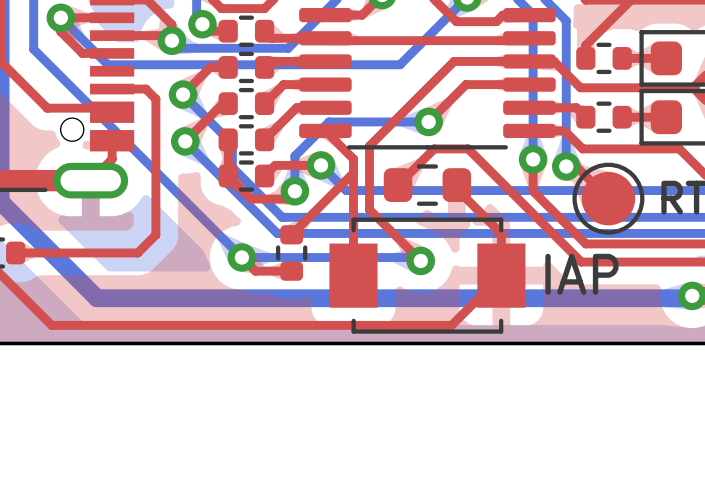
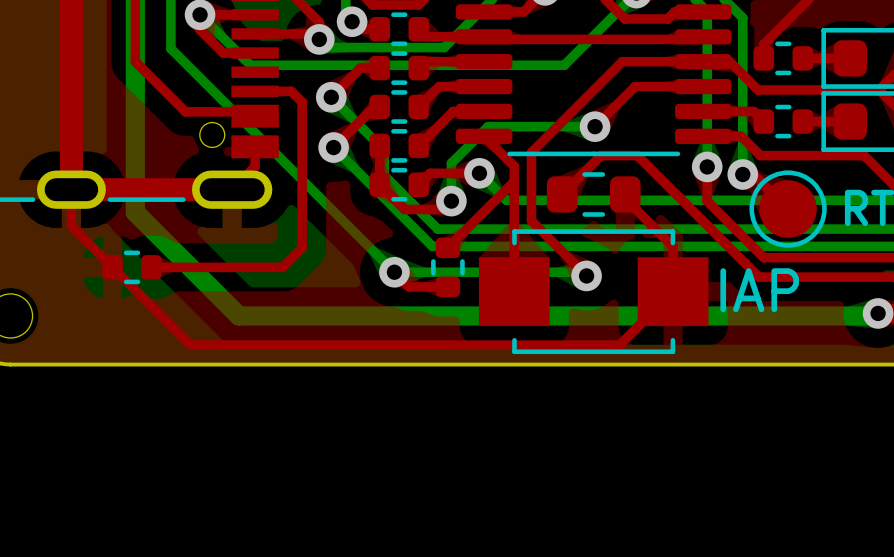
part footprint: [329, 217, 526, 334] -> [478, 229, 709, 355]

